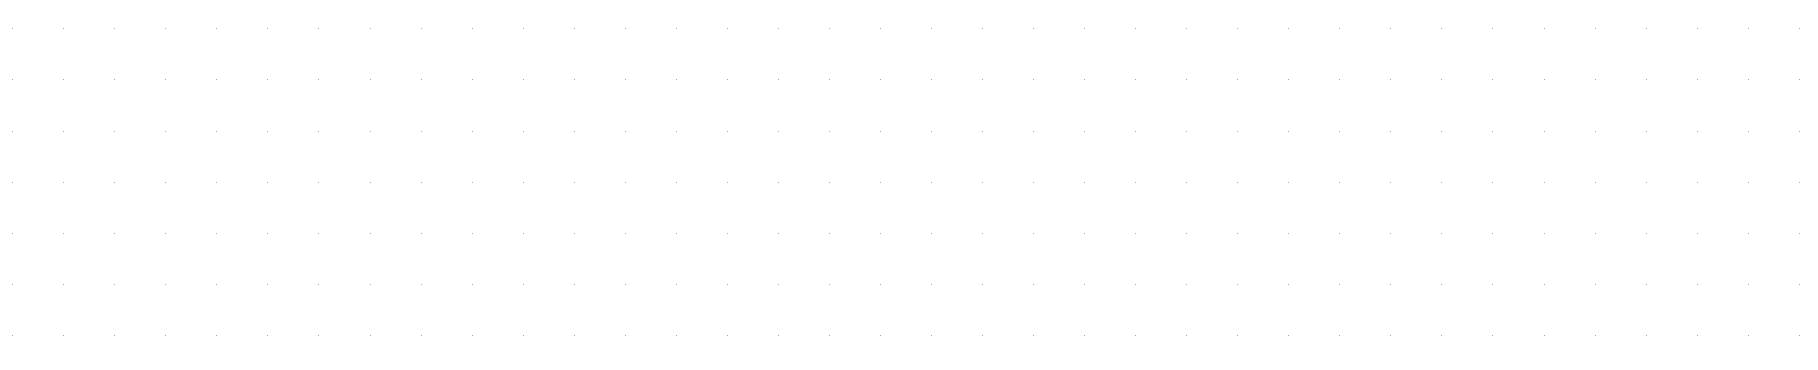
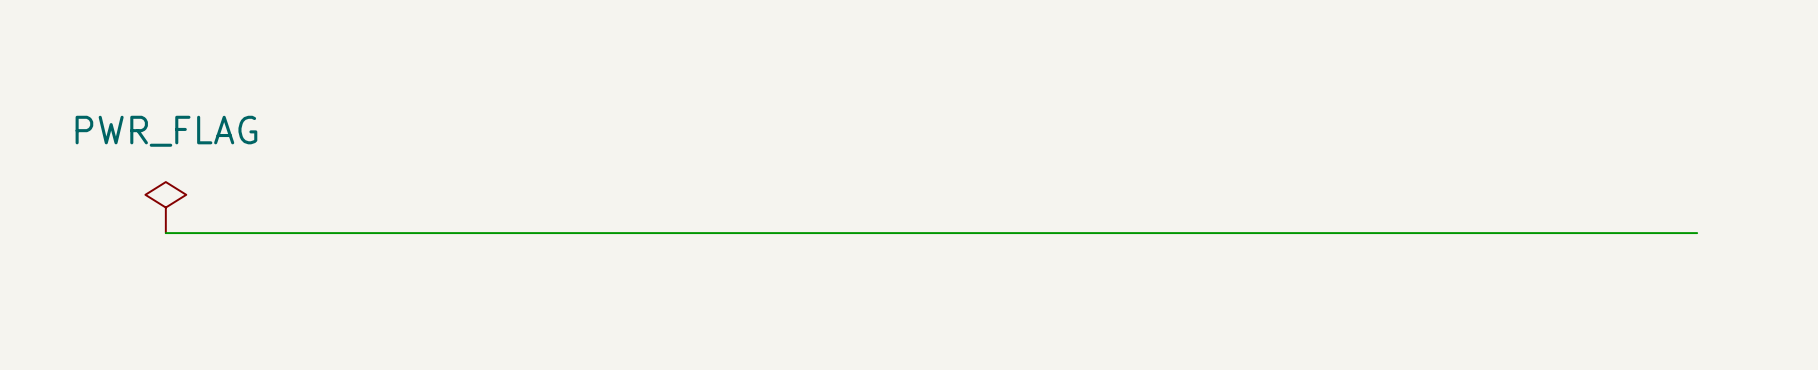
power symbol: none -> PWR_FLAG (165, 207)
wire: none -> (165, 233) (1697, 233)

